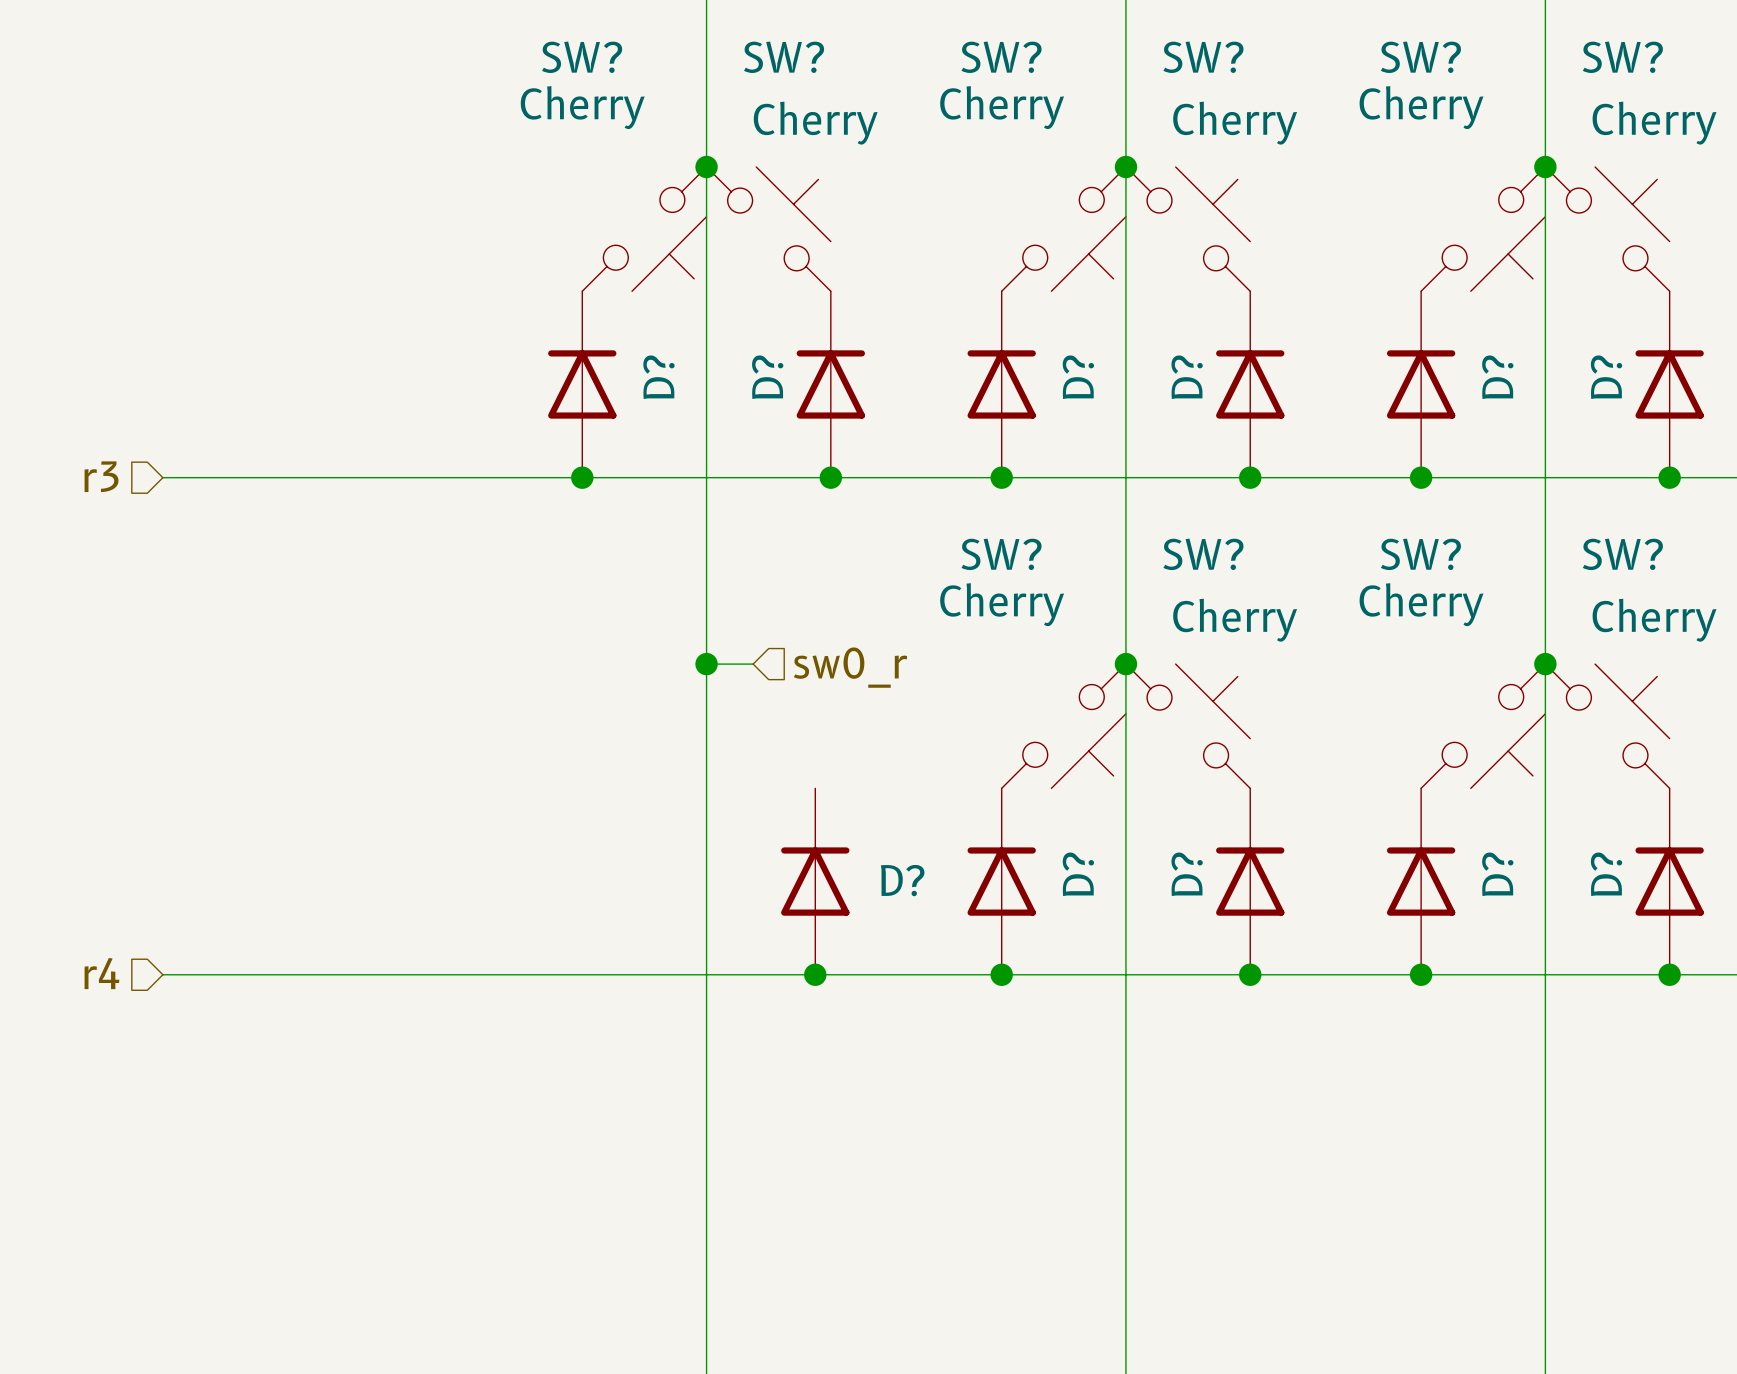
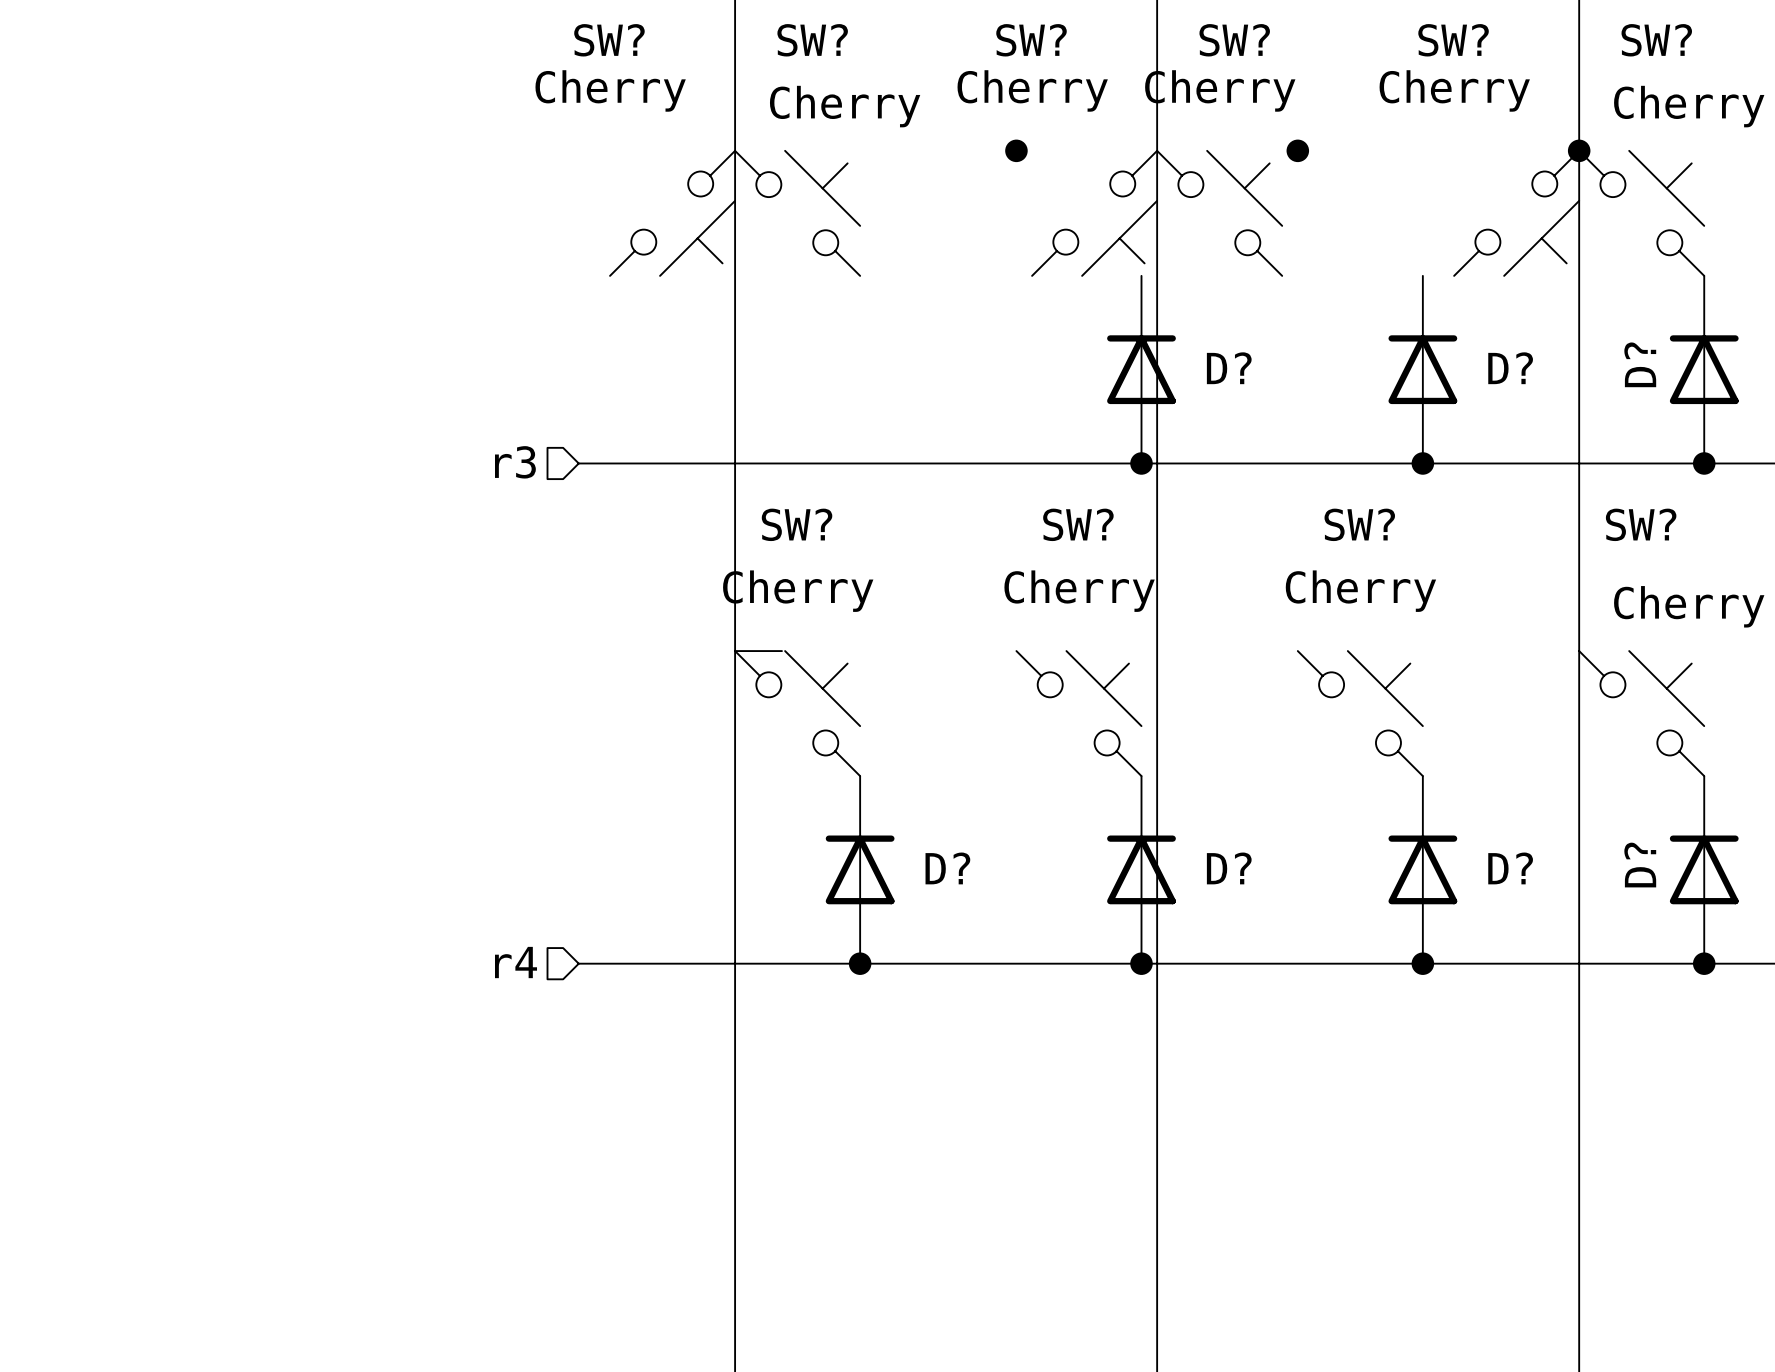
SW? value position: Cherry (1235, 123) -> Cherry (1220, 90)
junction: (706, 167) -> none
junction: none -> (1016, 150)
junction: (1125, 167) -> none
junction: none -> (1297, 150)
D? name rotation: 0° (1497, 377) -> 90° clockwise (1510, 368)
D?: (582, 384) -> none
D?: (830, 384) -> none
D?: (1001, 384) -> none
D?: none -> (1141, 369)
D?: (1250, 384) -> none
D? position: (1421, 384) -> (1422, 369)
hierarchical label position: r3 (101, 476) -> r3 (515, 462)
wire: (162, 477) (551, 477) -> none
junction: (582, 477) -> none
junction: (830, 477) -> none
junction: (1001, 477) -> none
junction: none -> (1141, 463)
junction: (1250, 477) -> none
junction position: (1421, 477) -> (1422, 463)
SW? name position: SW? (1001, 554) -> SW? (1078, 524)
SW? name position: SW? (1203, 554) -> SW? (1359, 524)
SW? name position: SW? (1622, 554) -> SW? (1641, 524)
SW? value position: Cherry (1002, 604) -> Cherry (1079, 591)
SW? value position: Cherry (1235, 620) -> Cherry (1360, 591)
junction: (706, 664) -> none
junction: (1125, 664) -> none
junction: (1545, 664) -> none
hierarchical label: sw0_r (850, 667) -> none
SW?: none -> Cherry (797, 713)
SW? flip: as is (1063, 726) -> up-down (1078, 713)
SW? position: (1188, 726) -> (1360, 713)
SW?: Cherry (1483, 726) -> none
D? name rotation: 0° (1497, 874) -> 90° clockwise (1510, 868)
D? position: (815, 881) -> (860, 869)
D?: (1001, 881) -> none
D?: none -> (1141, 869)
D?: (1250, 881) -> none
D? position: (1421, 881) -> (1422, 869)
hierarchical label position: r4 (101, 973) -> r4 (516, 962)
wire: (162, 974) (551, 974) -> none
junction position: (815, 974) -> (860, 963)
junction: (1001, 974) -> none
junction: none -> (1141, 963)
junction: (1250, 974) -> none
junction position: (1421, 974) -> (1422, 963)

